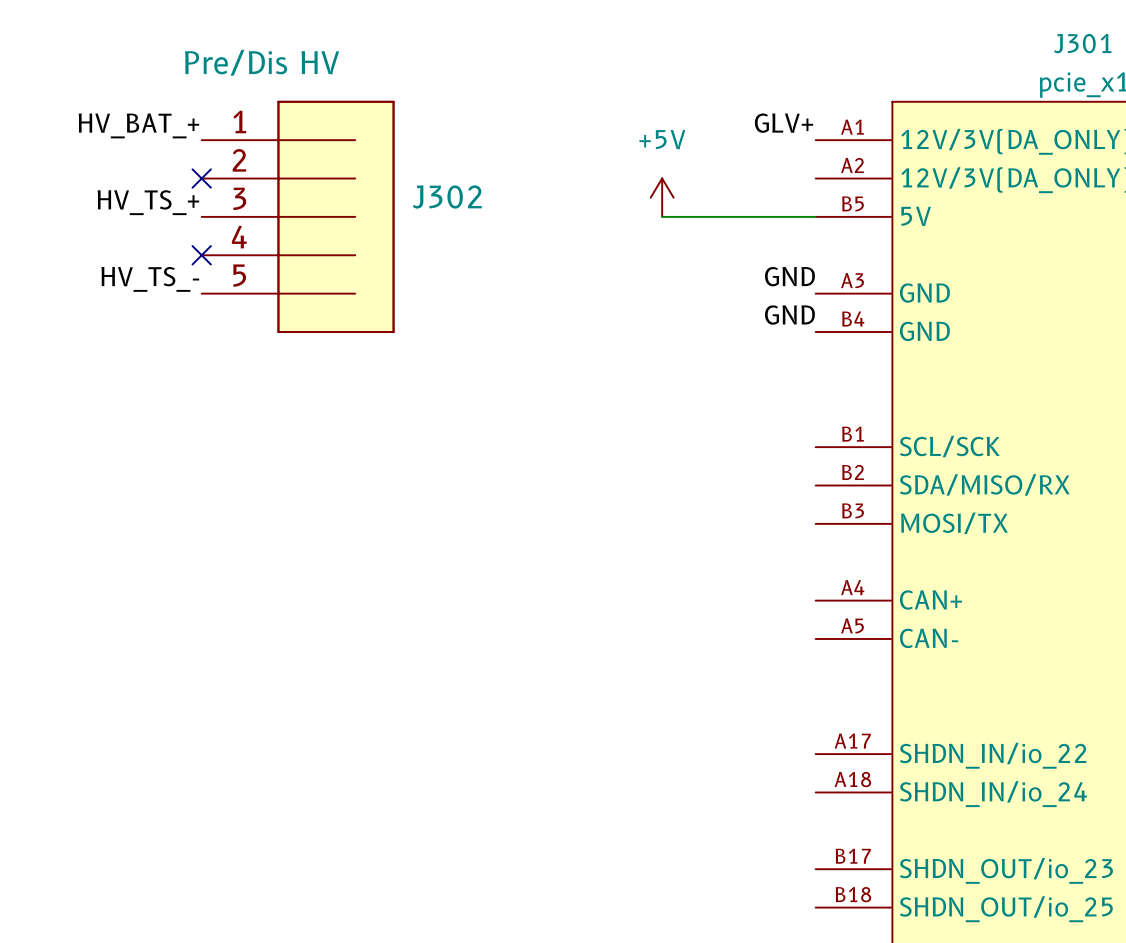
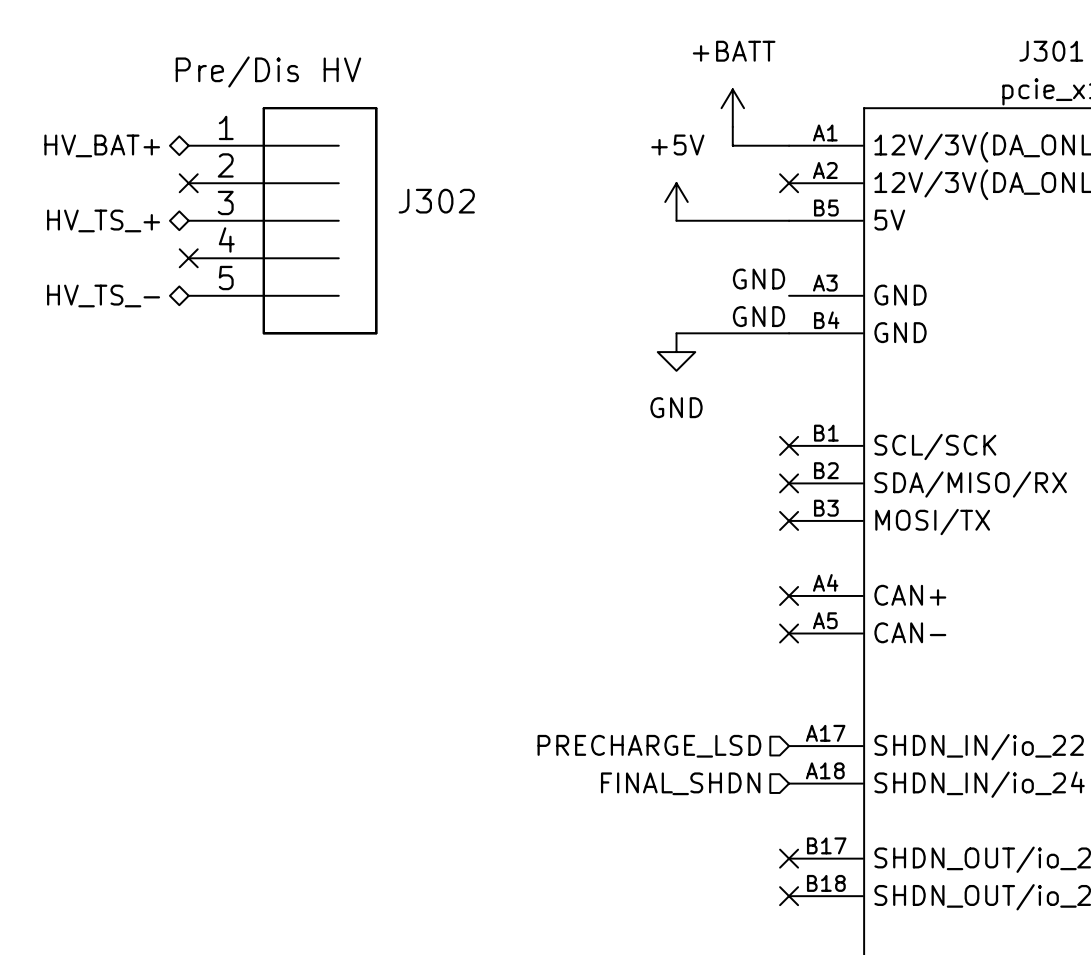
power symbol: none -> +BATT (732, 108)
wire: none -> (732, 126) (732, 145) (789, 145)
label: GLV+ (784, 123) -> none
label: HV_BAT_+ (138, 125) -> none
hierarchical label: none -> HV_BAT+ (102, 145)
no-connect mark: none -> (789, 183)
power symbol position: +5V (662, 197) -> +5V (676, 202)
label: HV_TS_+ (148, 202) -> none
wire: (662, 216) (700, 216) -> none
hierarchical label: none -> HV_TS_+ (103, 220)
label: HV_TS_- (150, 279) -> none
hierarchical label: none -> HV_TS_- (103, 296)
wire: none -> (676, 333) (789, 333)
power symbol: none -> GND (676, 352)
no-connect mark: none -> (789, 445)
no-connect mark: none -> (789, 483)
no-connect mark: none -> (789, 520)
no-connect mark: none -> (789, 595)
no-connect mark: none -> (789, 633)
hierarchical label: none -> PRECHARGE_LSD (649, 746)
hierarchical label: none -> FINAL_SHDN (680, 783)
no-connect mark: none -> (789, 858)
no-connect mark: none -> (789, 896)

